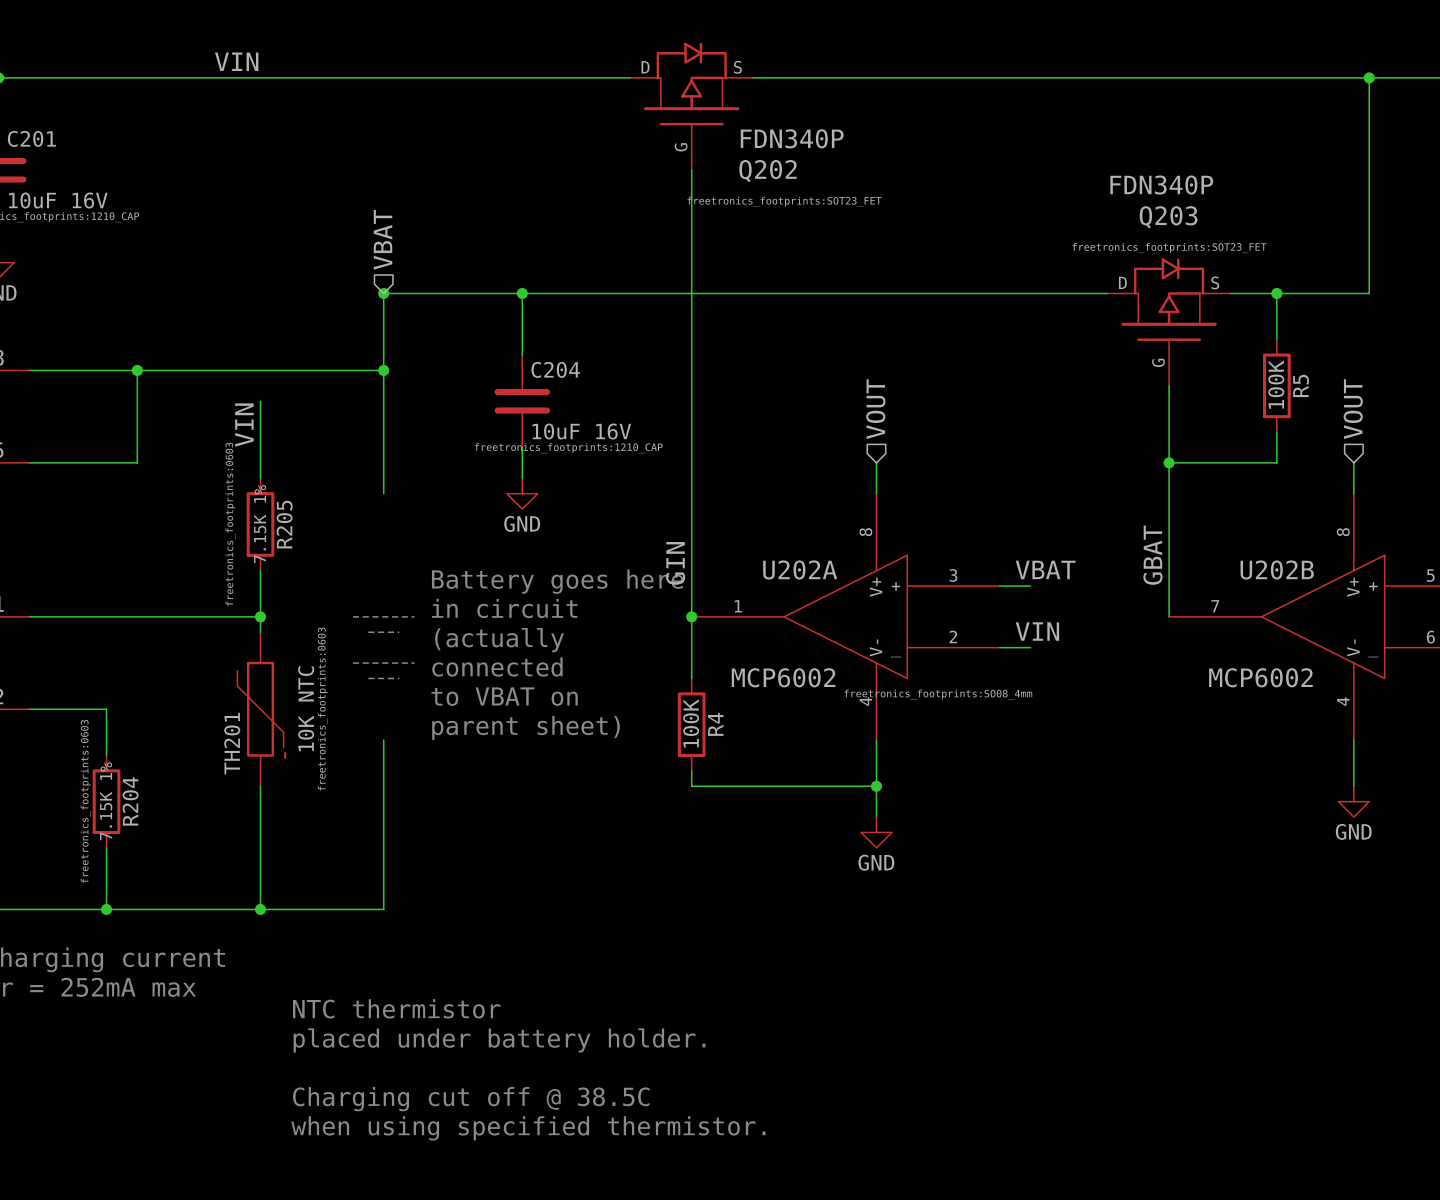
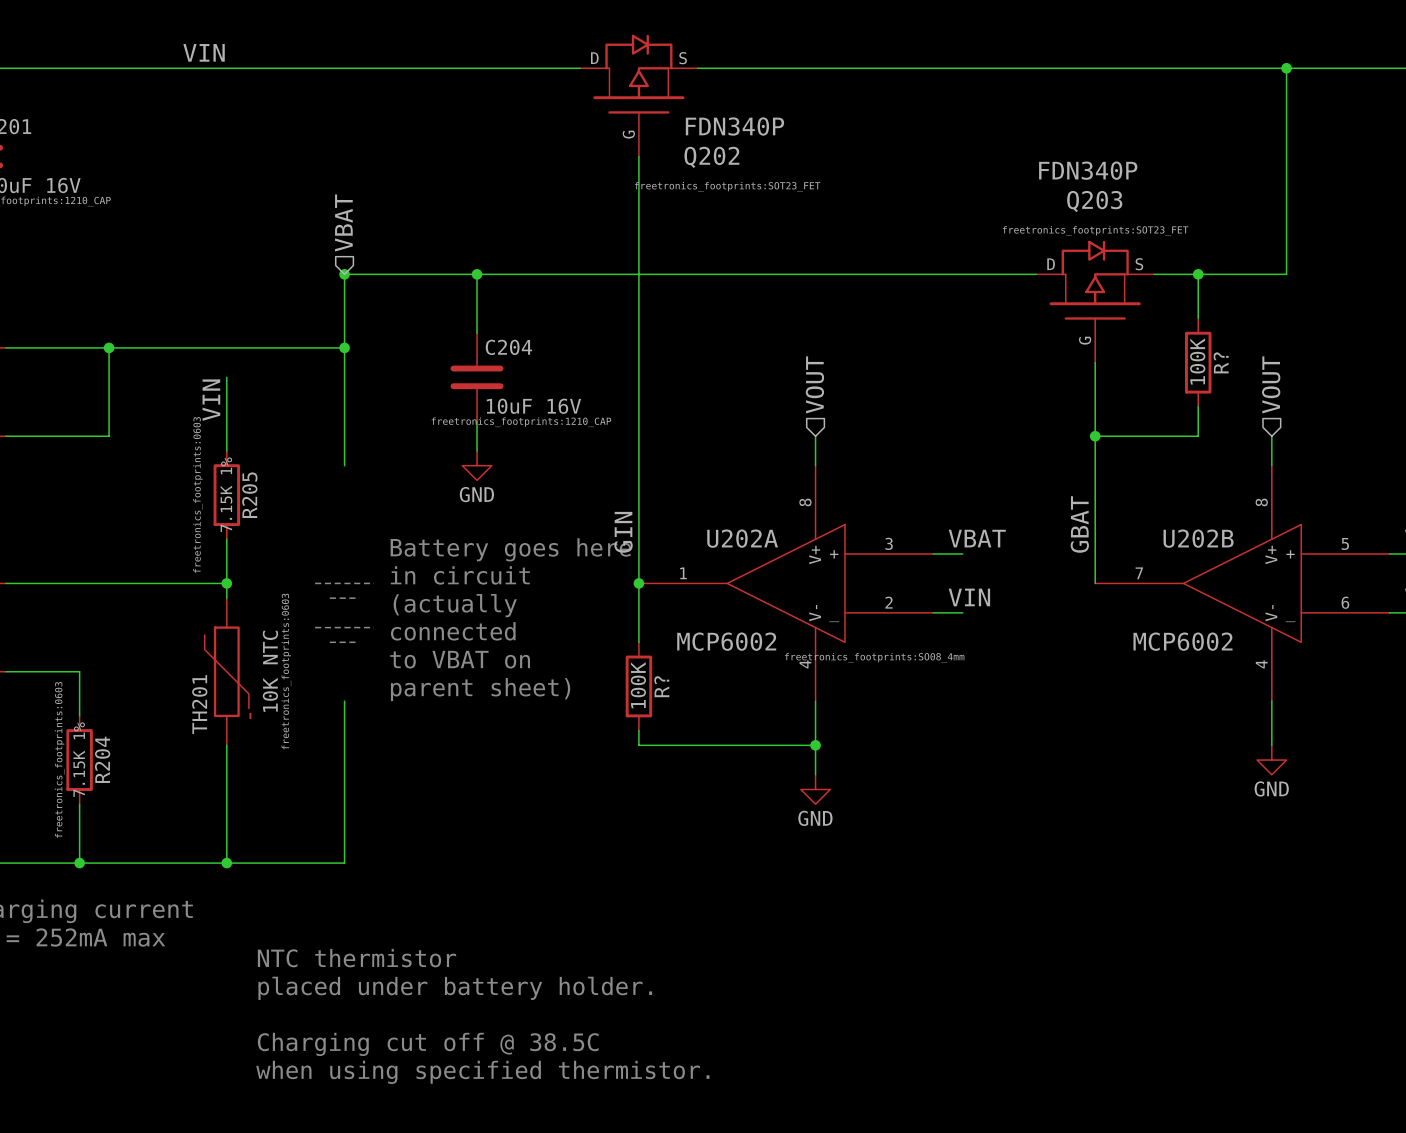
R5 name: R5 (1301, 385) -> R? (1221, 362)
R4 name: R4 (715, 724) -> R? (661, 686)

